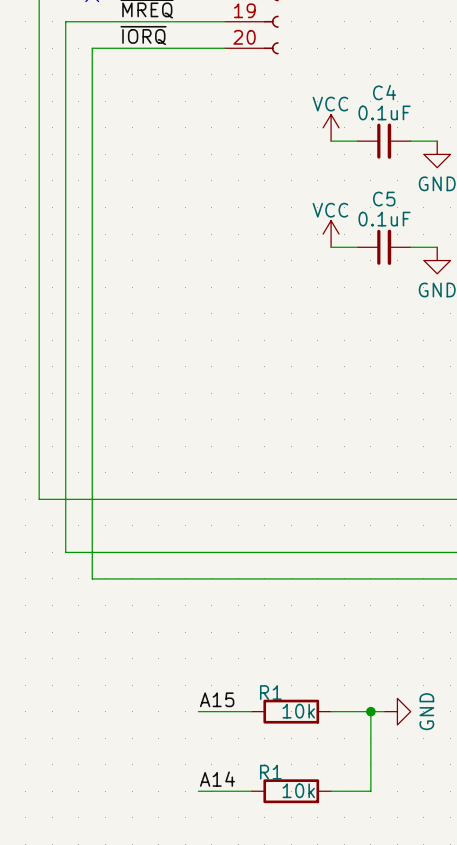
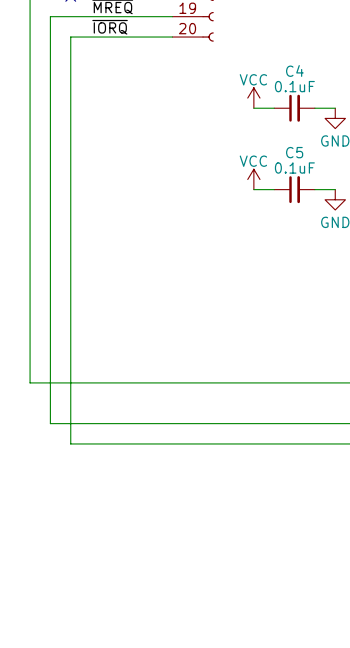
label: A15 (217, 699) -> none
wire: (198, 711) (251, 711) -> none
R1: 10k (291, 711) -> none
wire: (331, 711) (384, 711) -> none
wire: (370, 711) (370, 791) (331, 791) -> none
junction: (370, 711) -> none
power symbol: GND (397, 711) -> none
label: A14 (217, 779) -> none
wire: (198, 791) (251, 791) -> none
R1: 10k (291, 791) -> none

